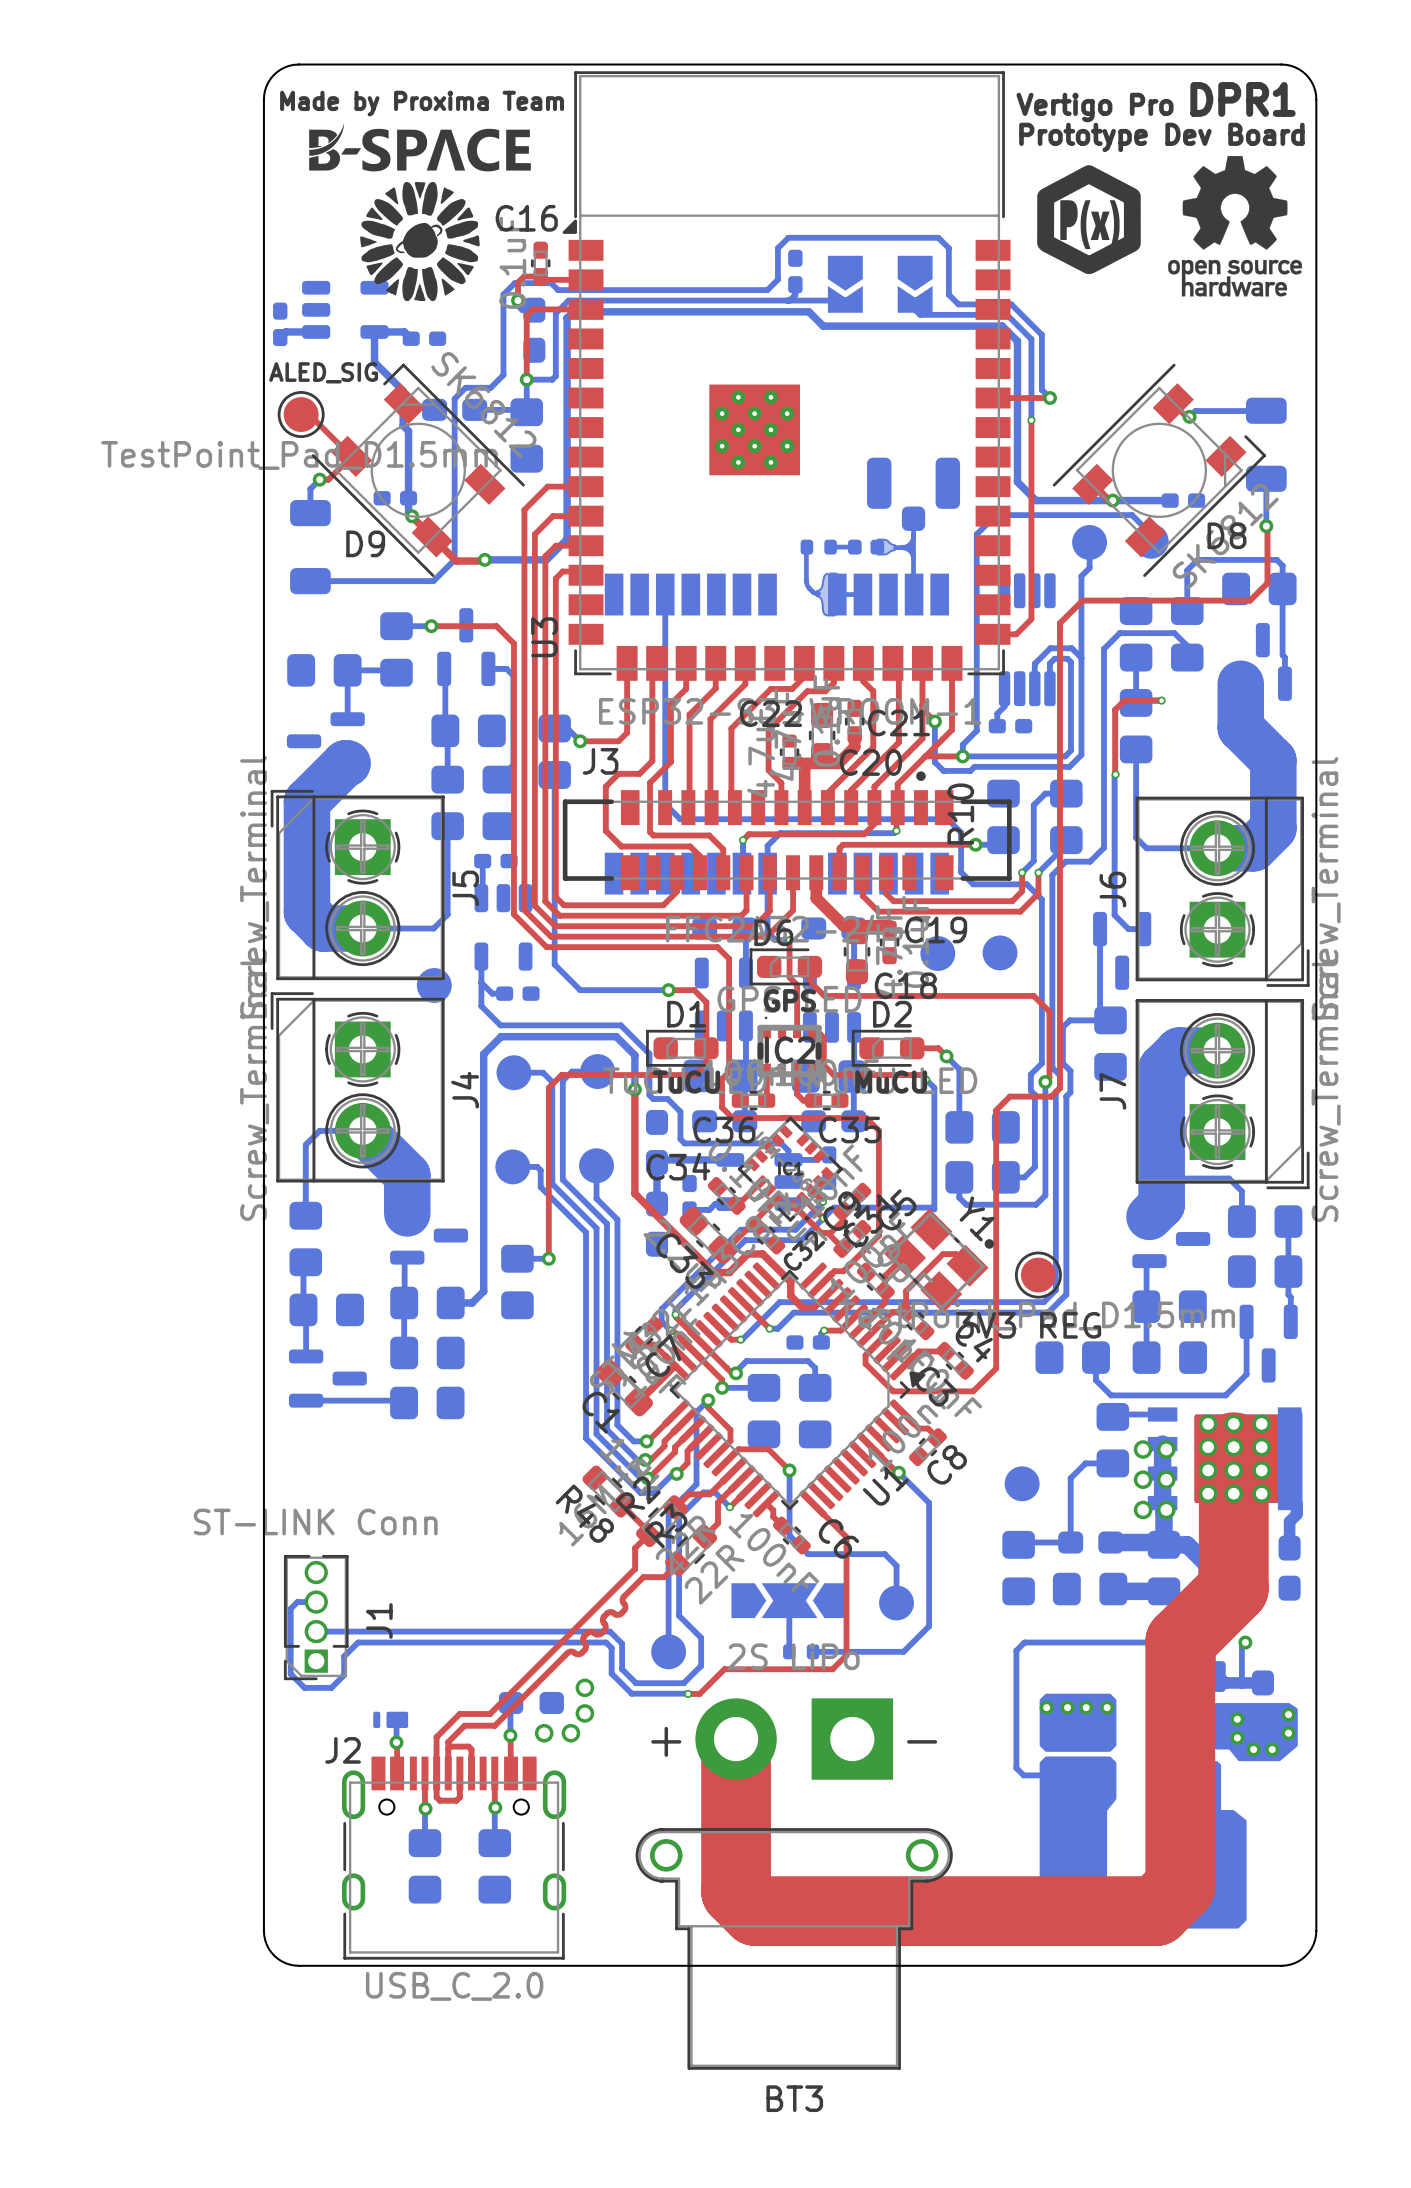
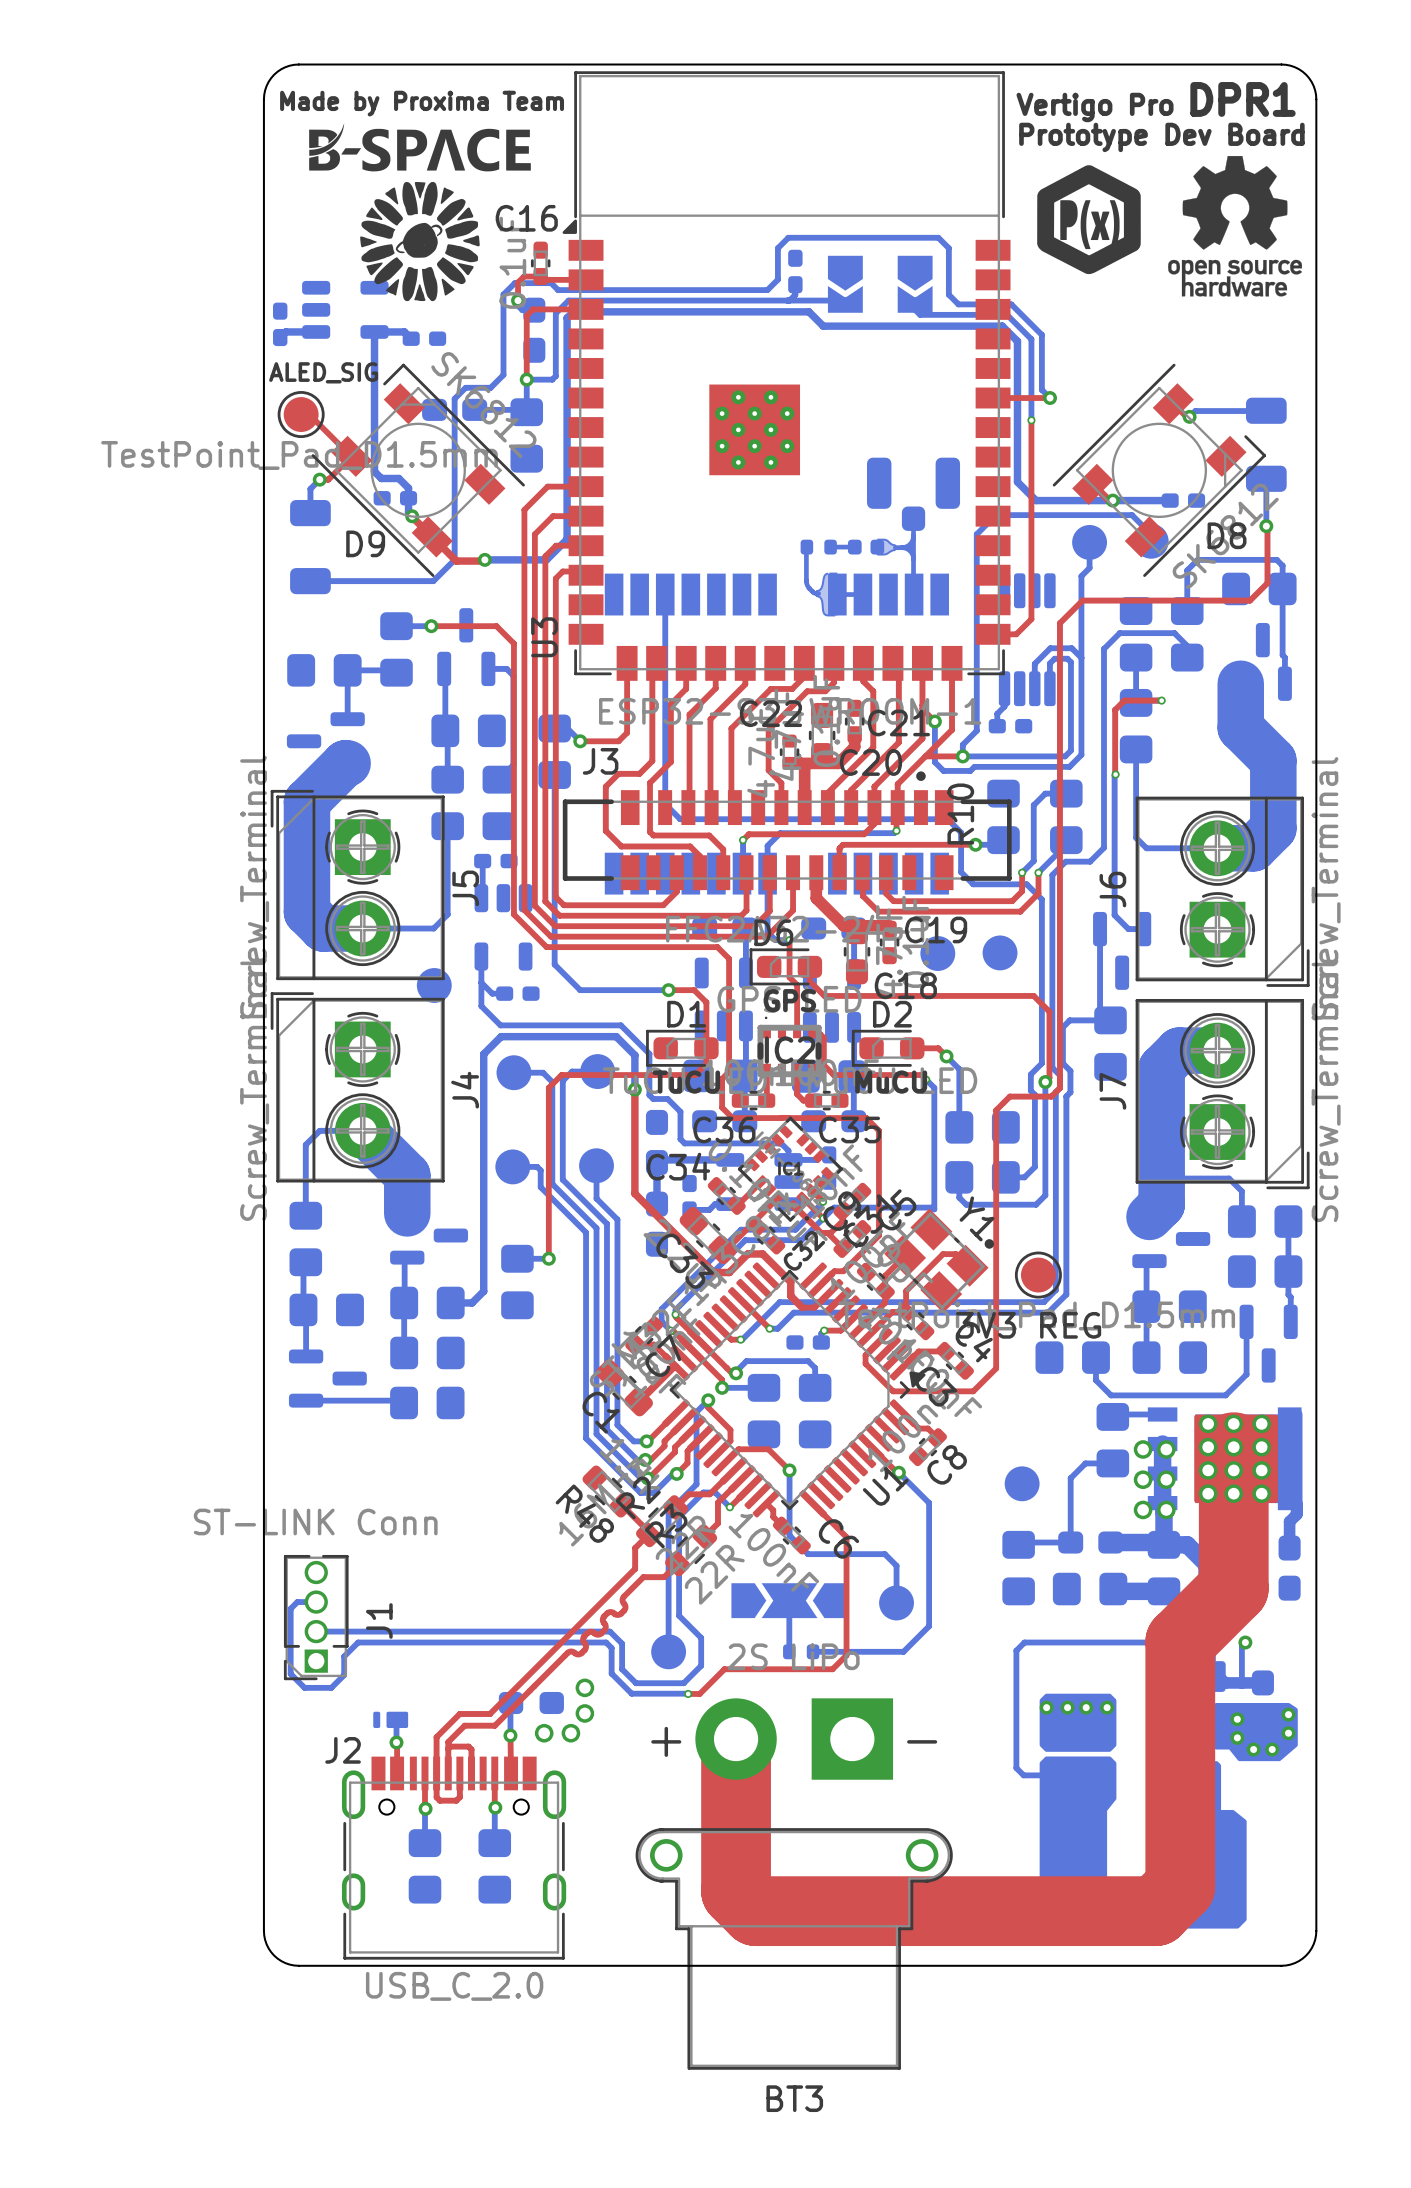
bottom track: (374, 362) (403, 390) (403, 425) (408, 431) (408, 488) -> (374, 362) (374, 471) (381, 478) (398, 478) (408, 488)

